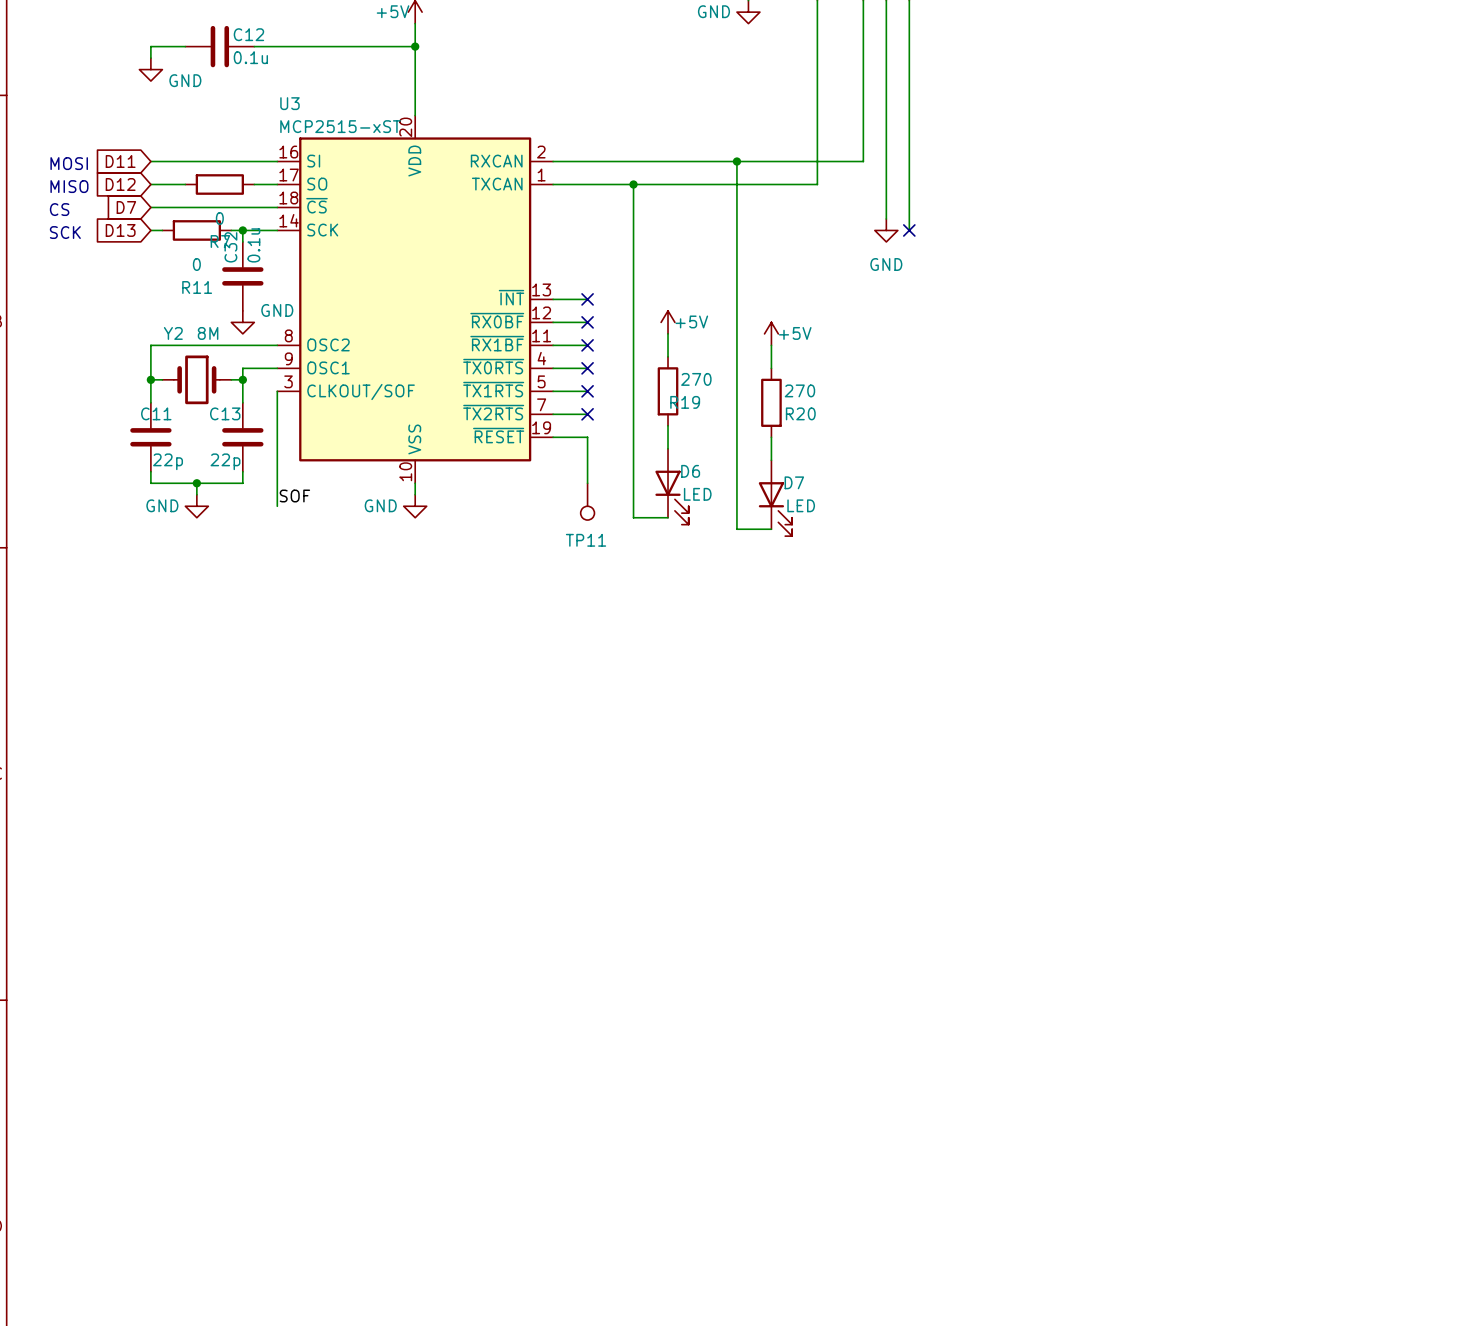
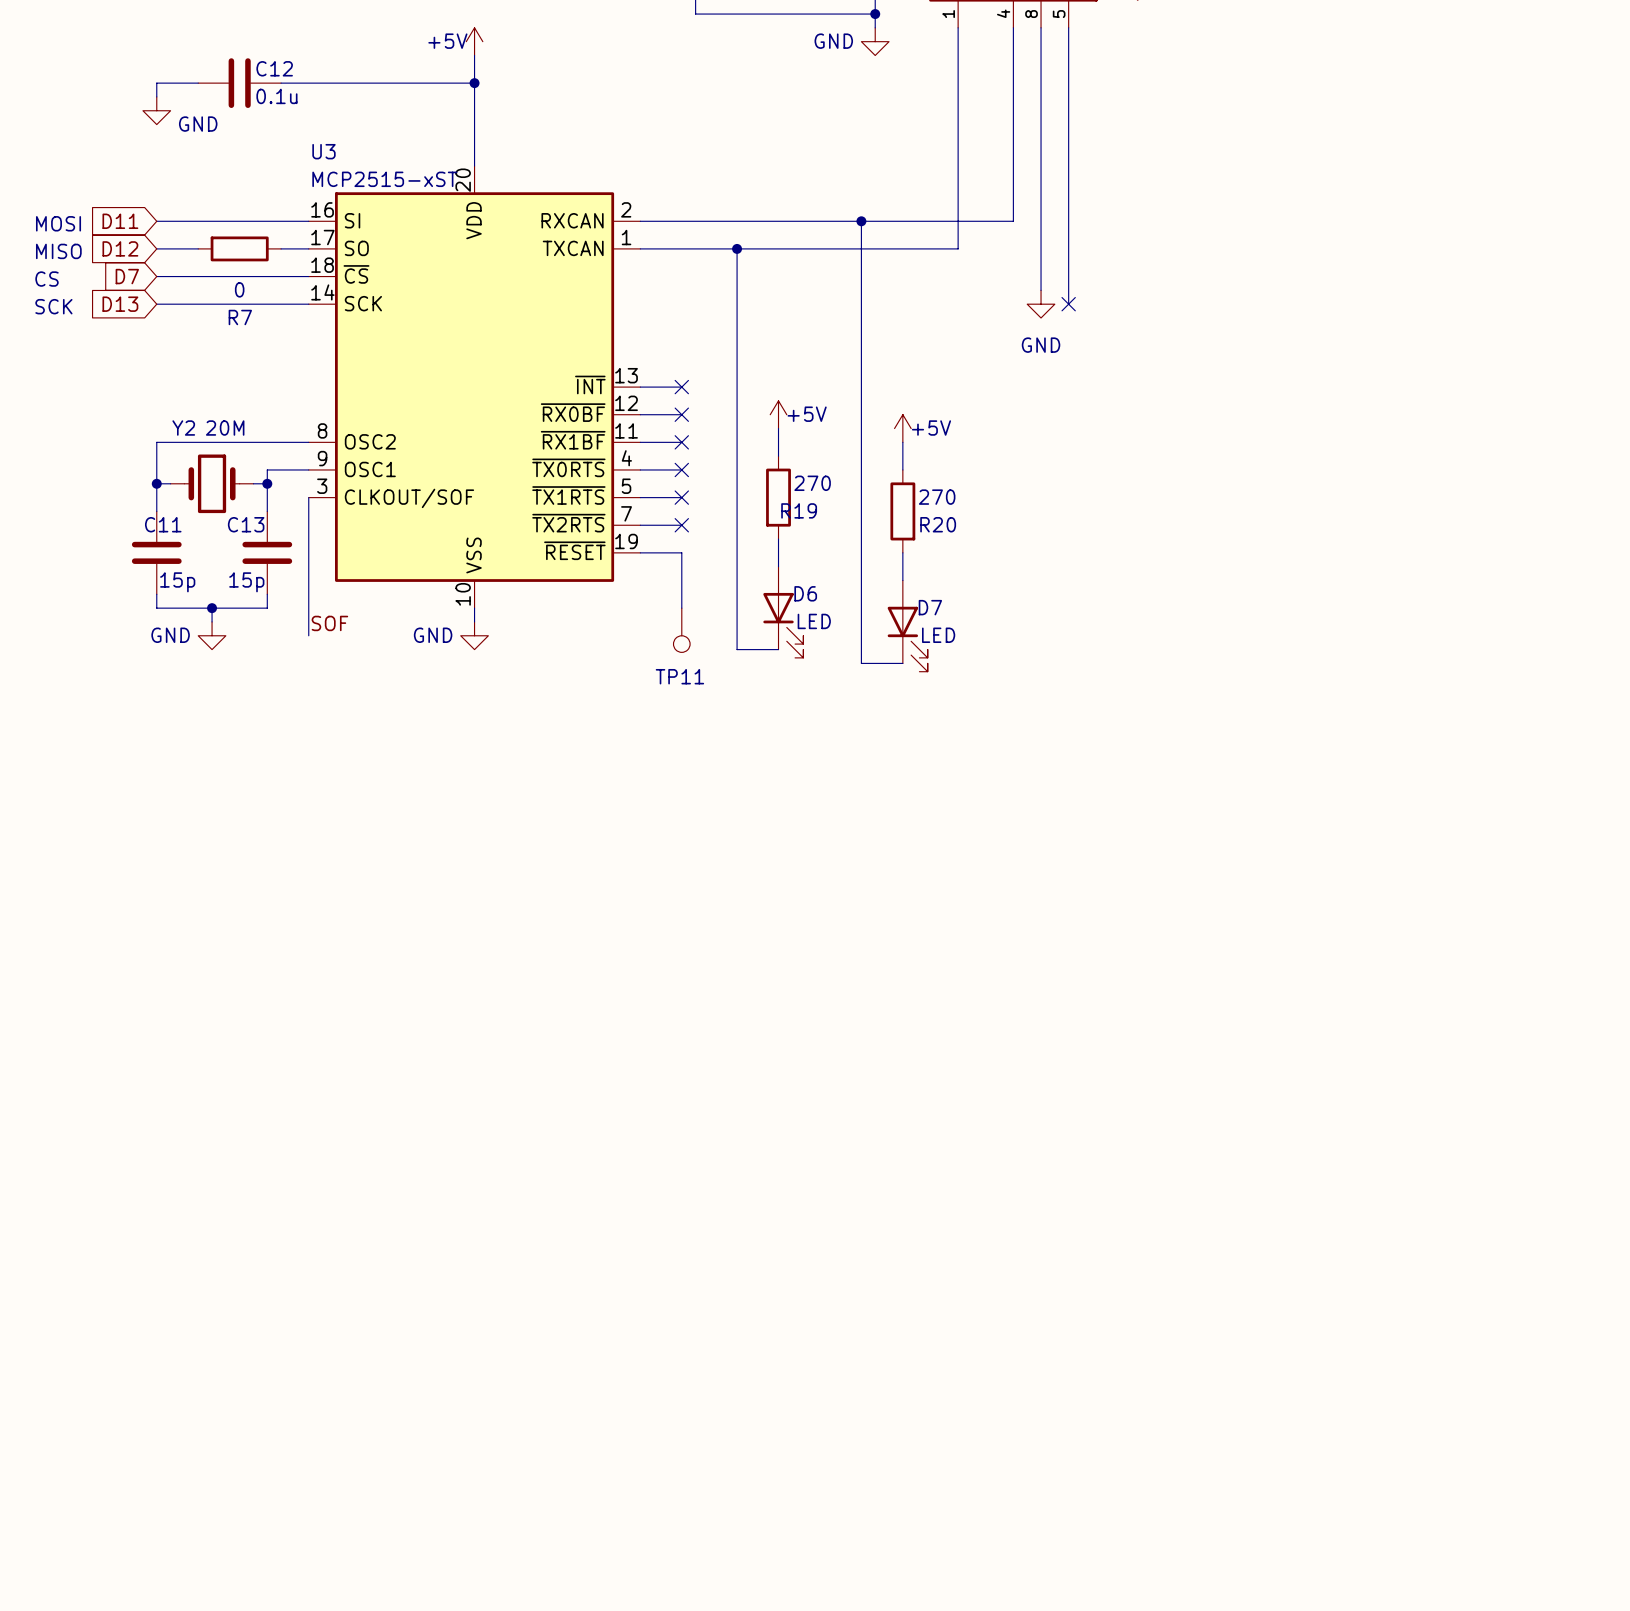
wire: none -> (170, 304) (253, 304)
R11: 0 (196, 230) -> none
wire: (242, 230) (242, 241) -> none
junction: (242, 230) -> none
C32: 0.1u (242, 276) -> none
power symbol: GND (242, 322) -> none
Y2 value: 8M (208, 333) -> 20M (225, 428)
C11 value: 22p (168, 461) -> 15p (177, 582)
C13 value: 22p (225, 461) -> 15p (246, 582)

